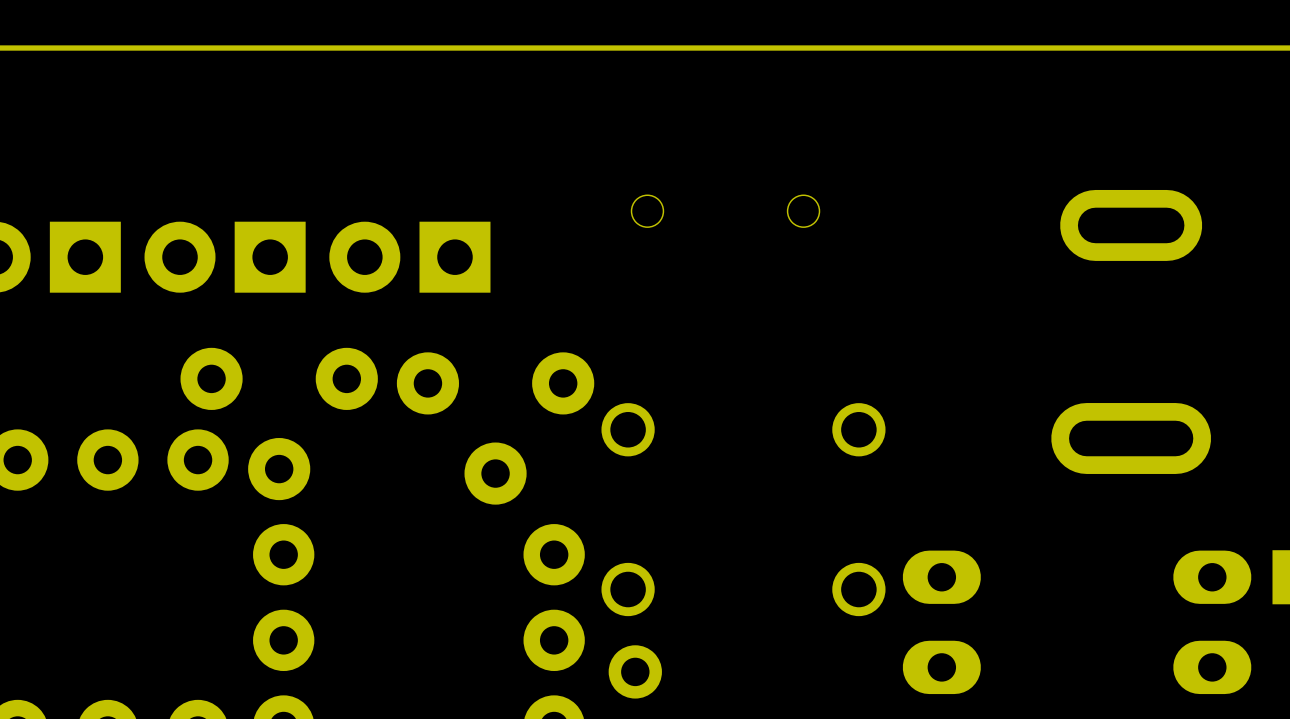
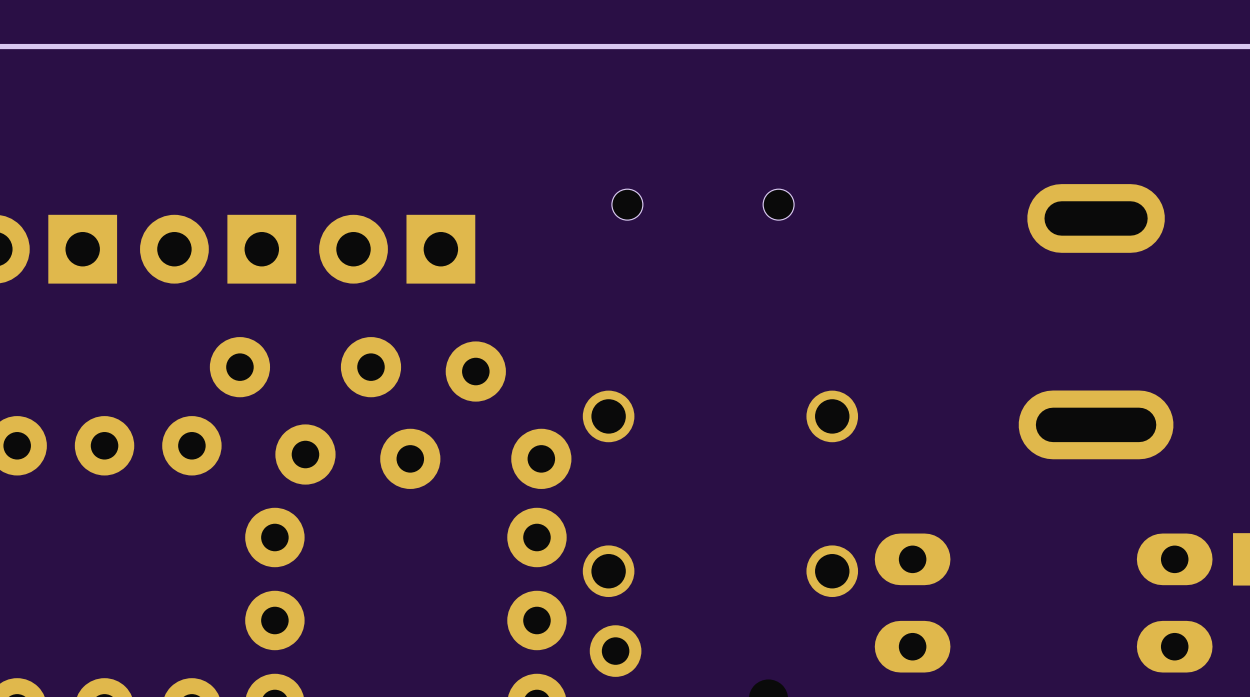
part position: (279, 423) -> (305, 410)
part rotation: 0° (495, 428) -> 180° (475, 415)

